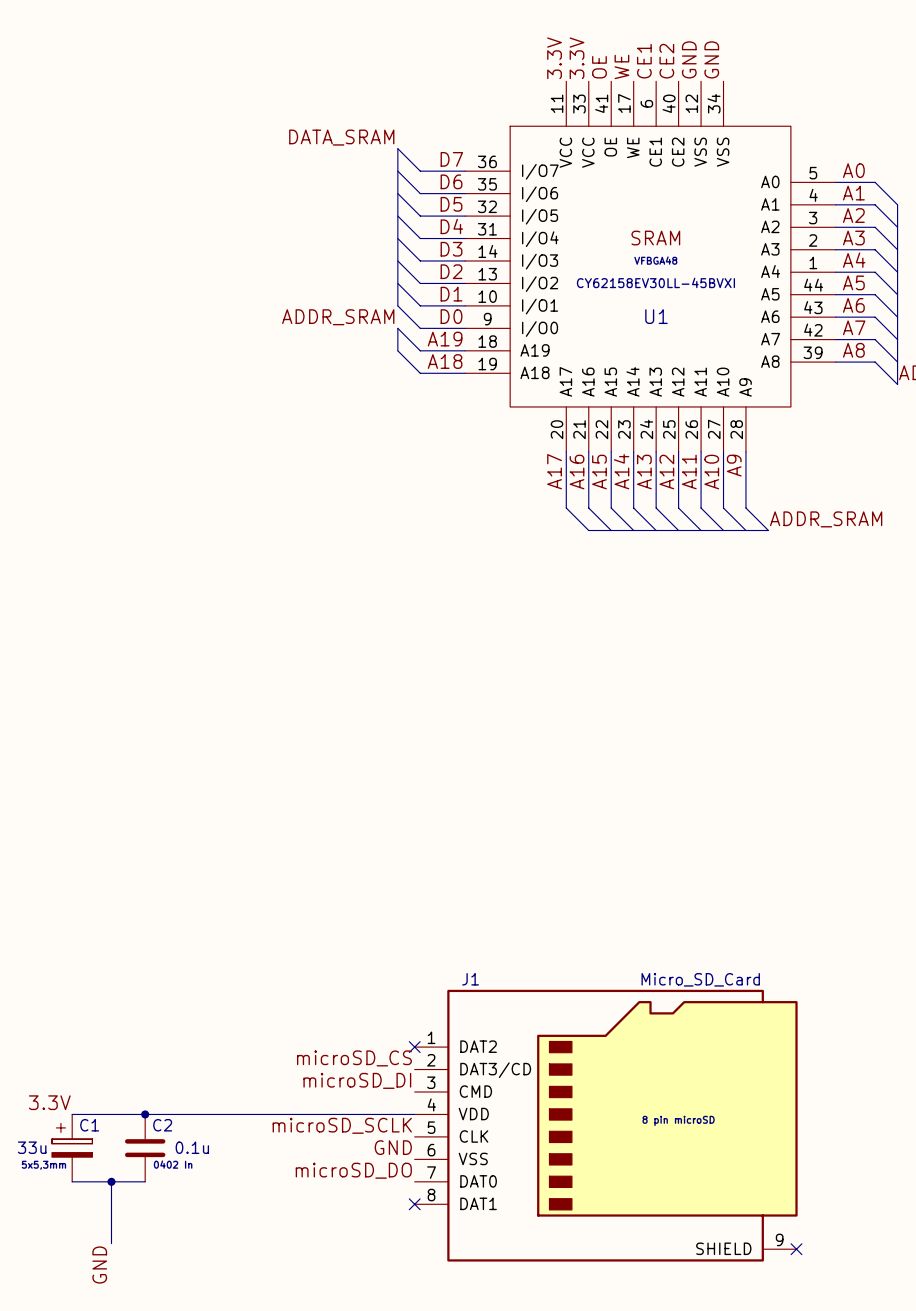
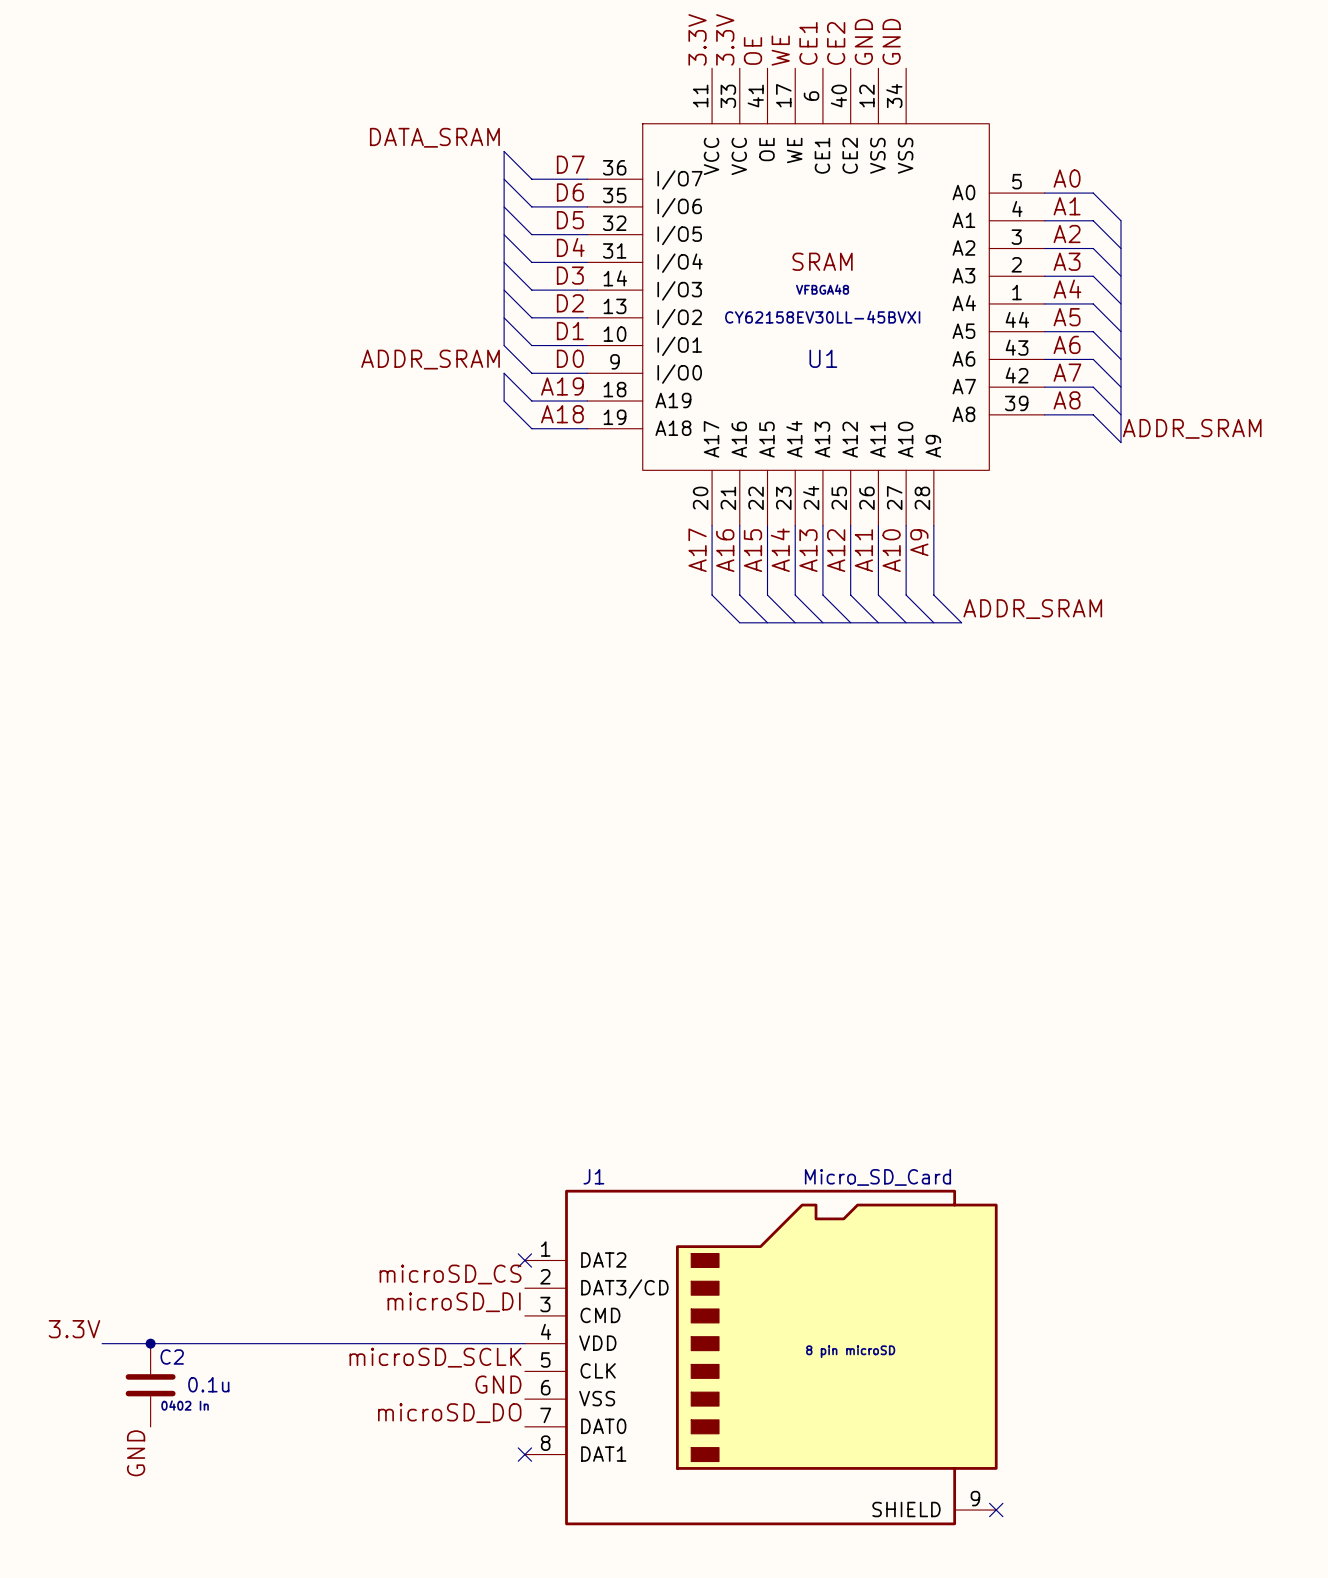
junction: none -> (150, 1343)
junction: (145, 1114) -> none
C1: 33u (72, 1148) -> none
C2 position: (145, 1148) -> (150, 1385)
wire: (72, 1181) (145, 1181) -> none
wire: (111, 1181) (111, 1243) -> none
junction: (111, 1181) -> none
label position: GND (99, 1265) -> GND (136, 1453)

